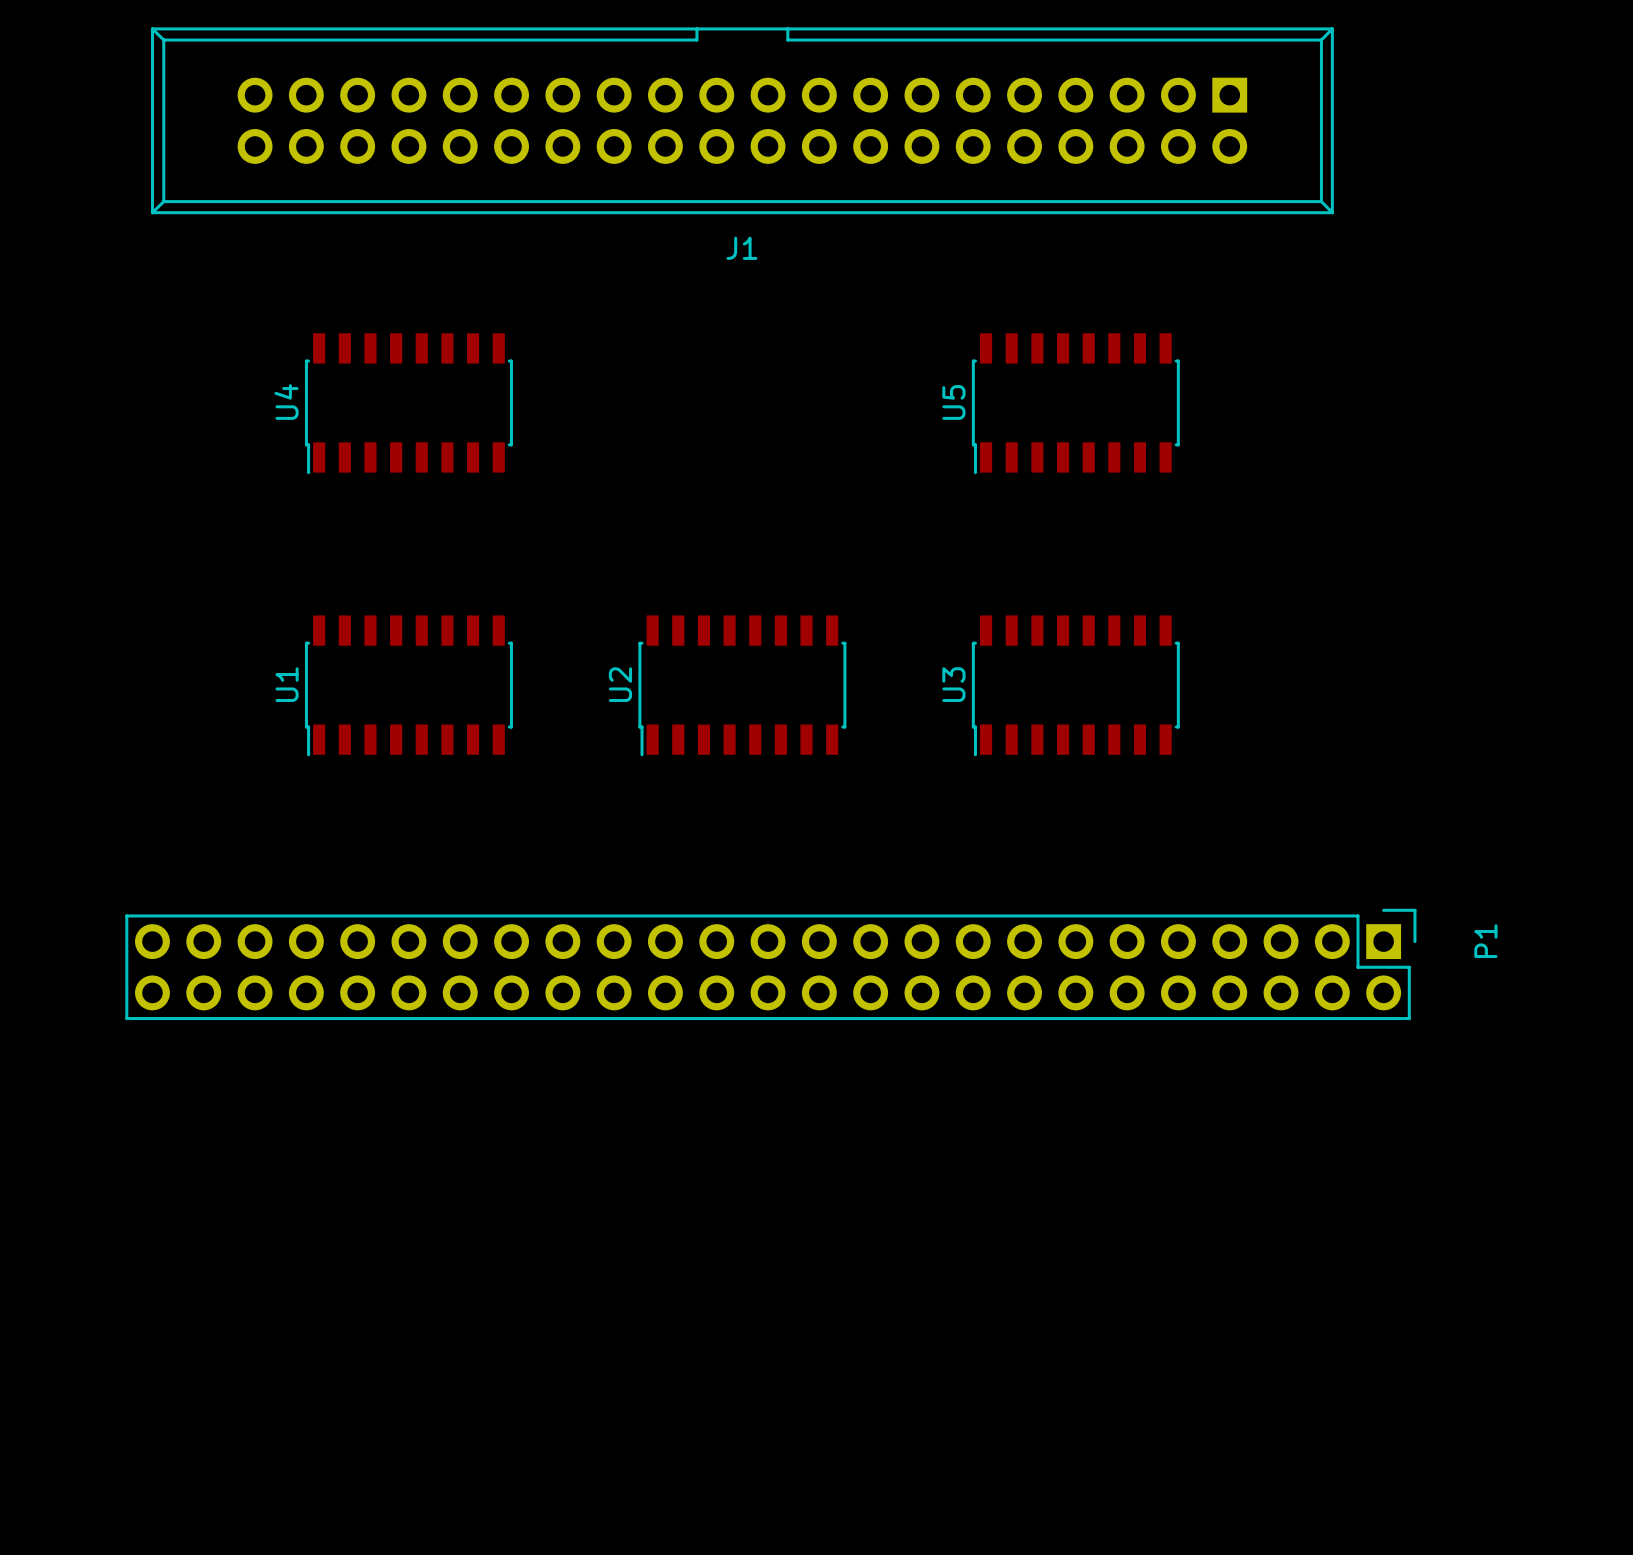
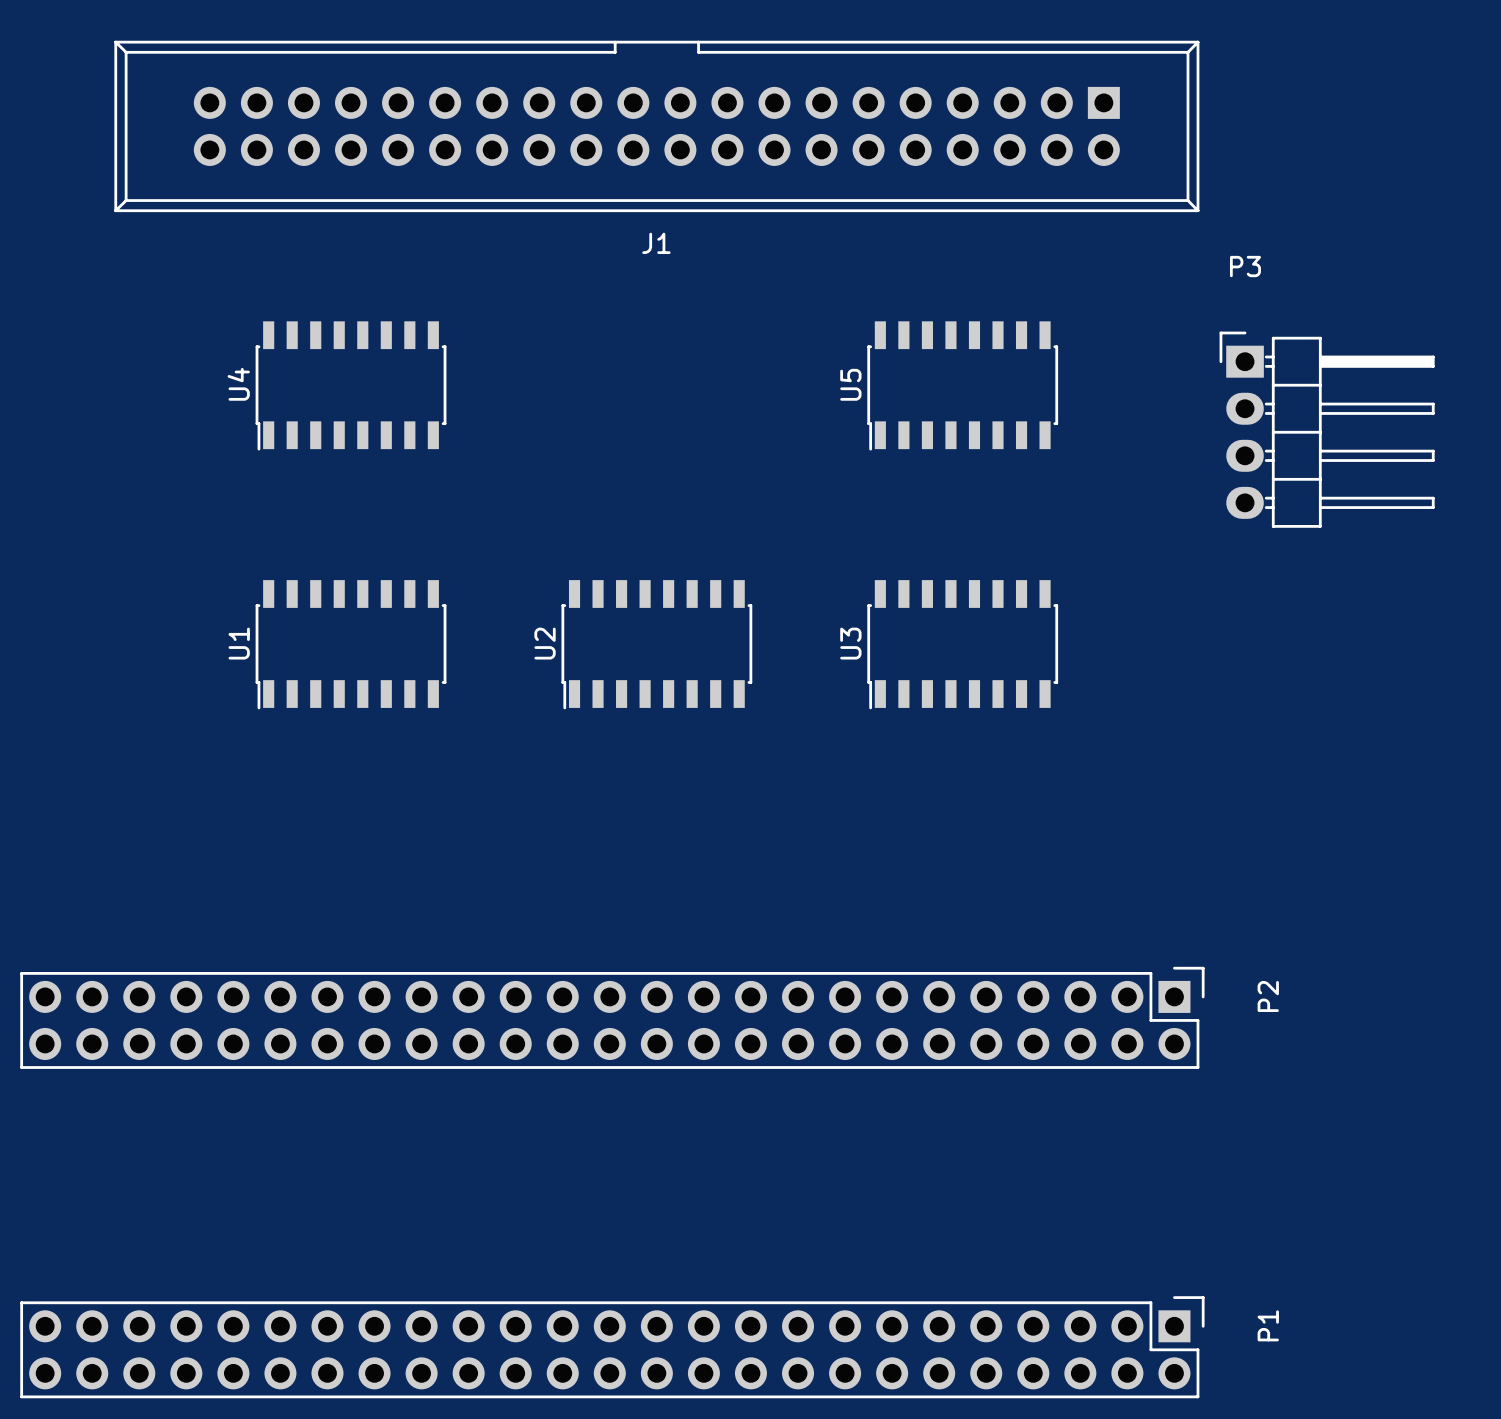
P3: none -> (1327, 429)
P1 position: (770, 964) -> (612, 1347)
P2: none -> (612, 1017)

